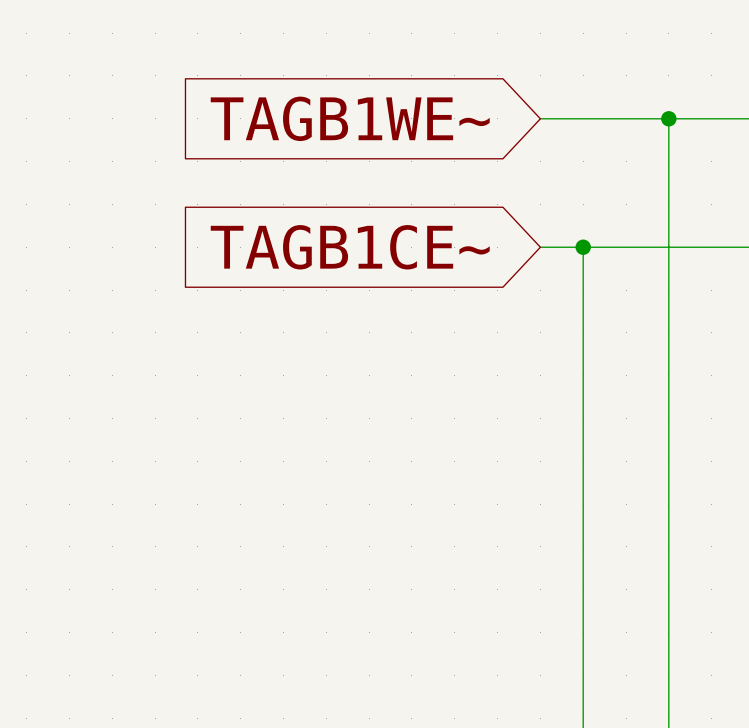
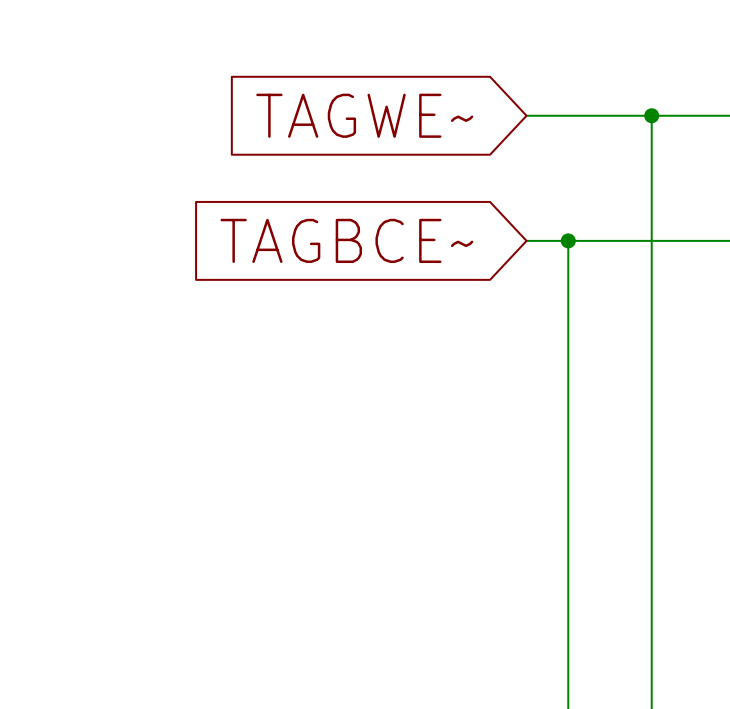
global label: TAGB1WE~ (350, 118) -> TAGWE~ (364, 115)
global label: TAGB1CE~ (350, 247) -> TAGBCE~ (346, 240)

